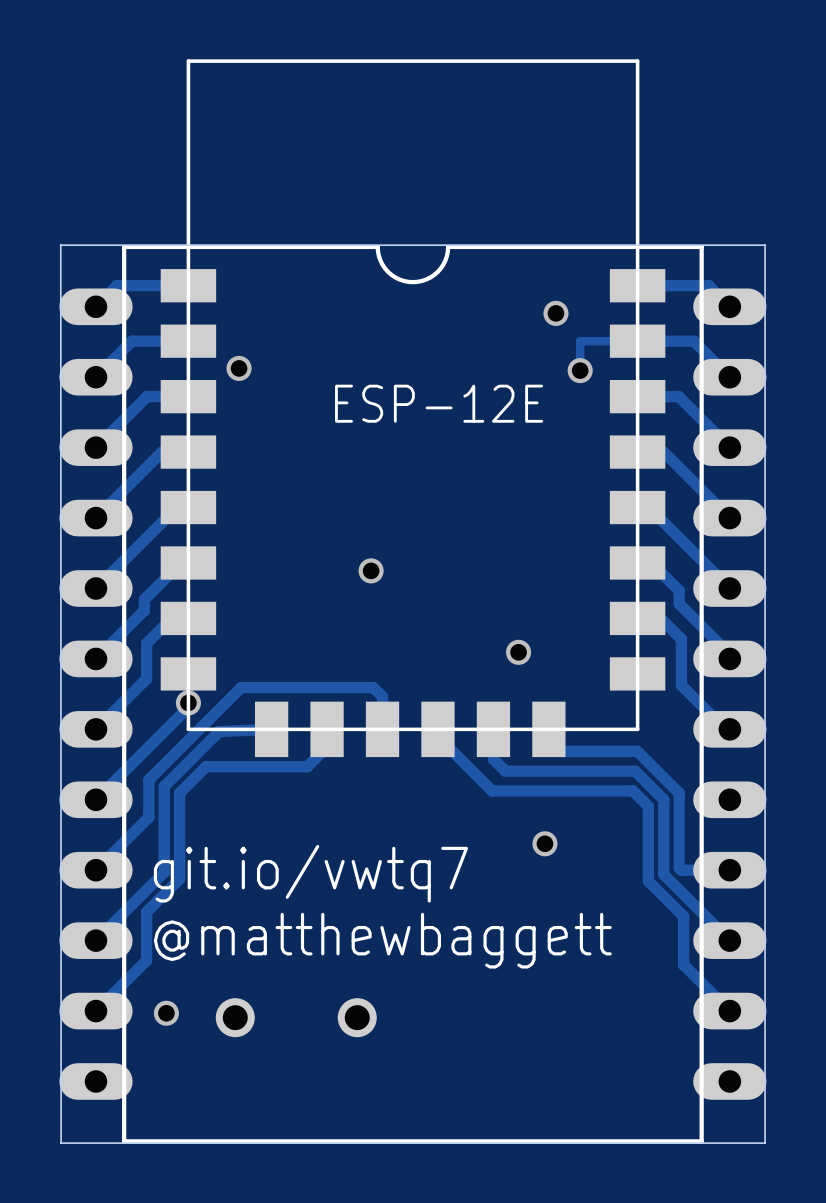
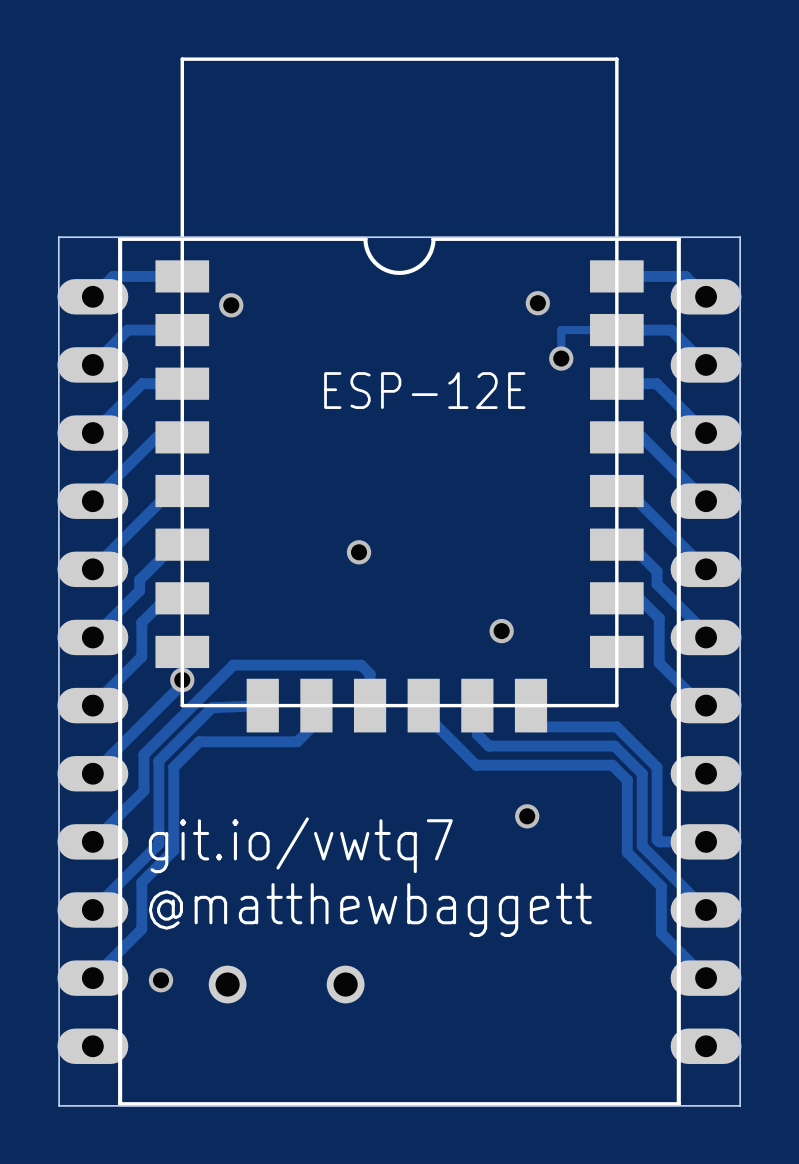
via position: (239, 368) -> (231, 305)

